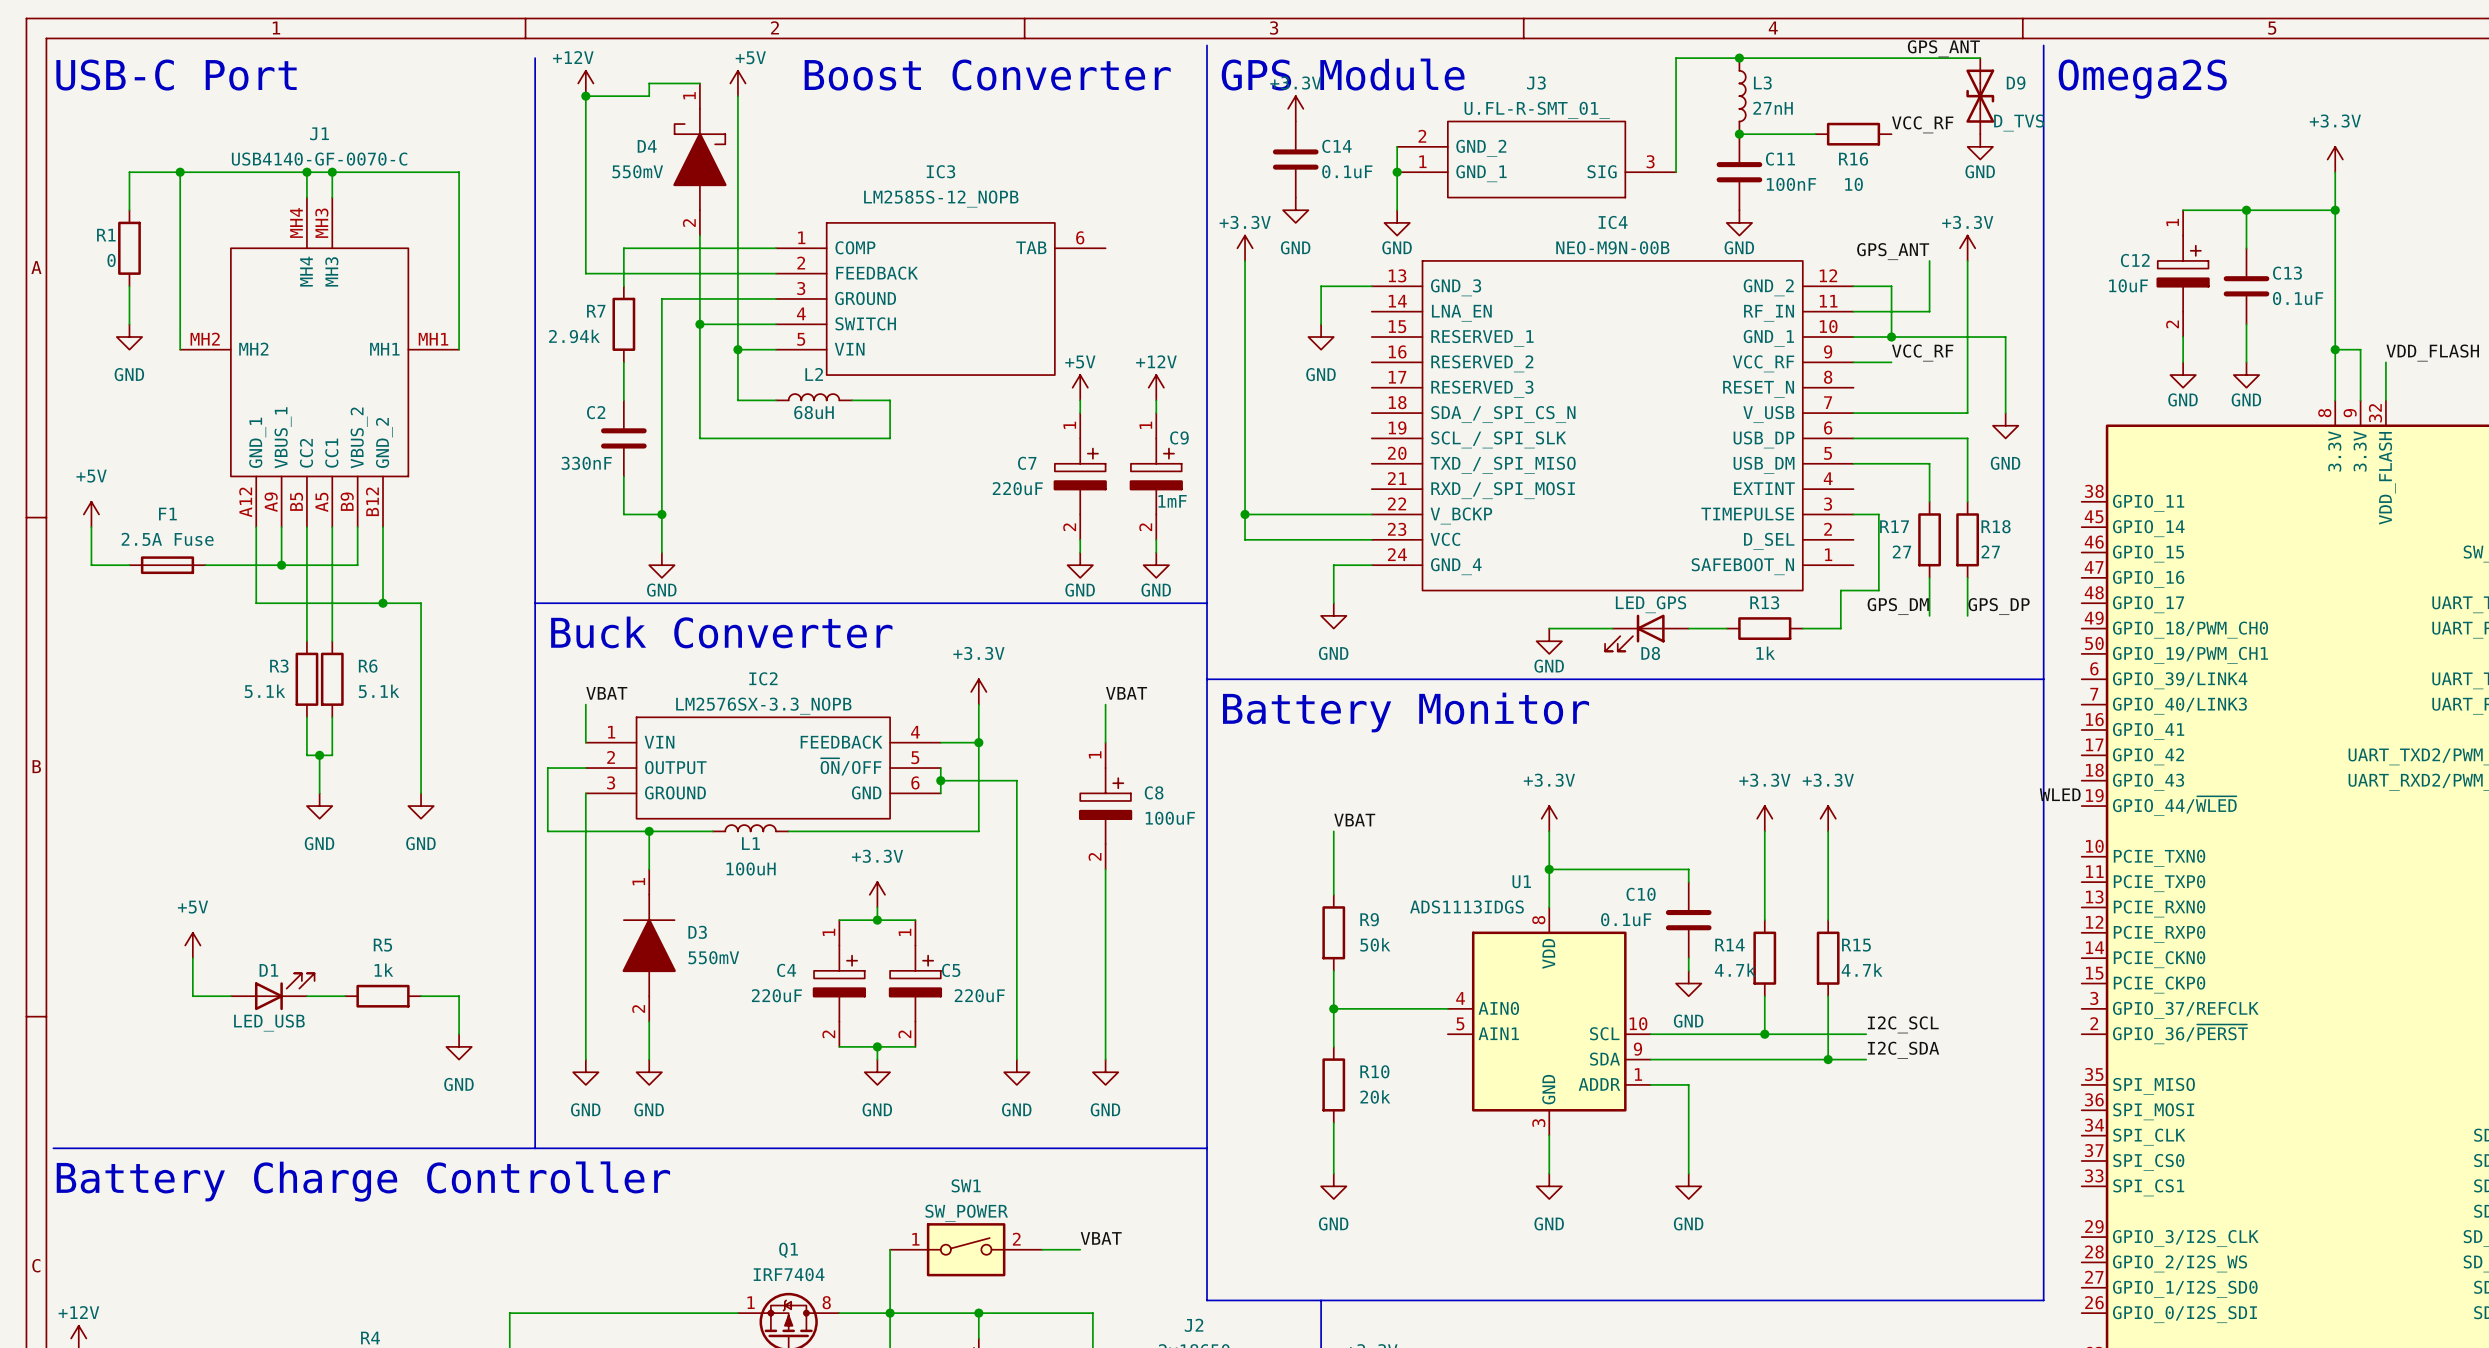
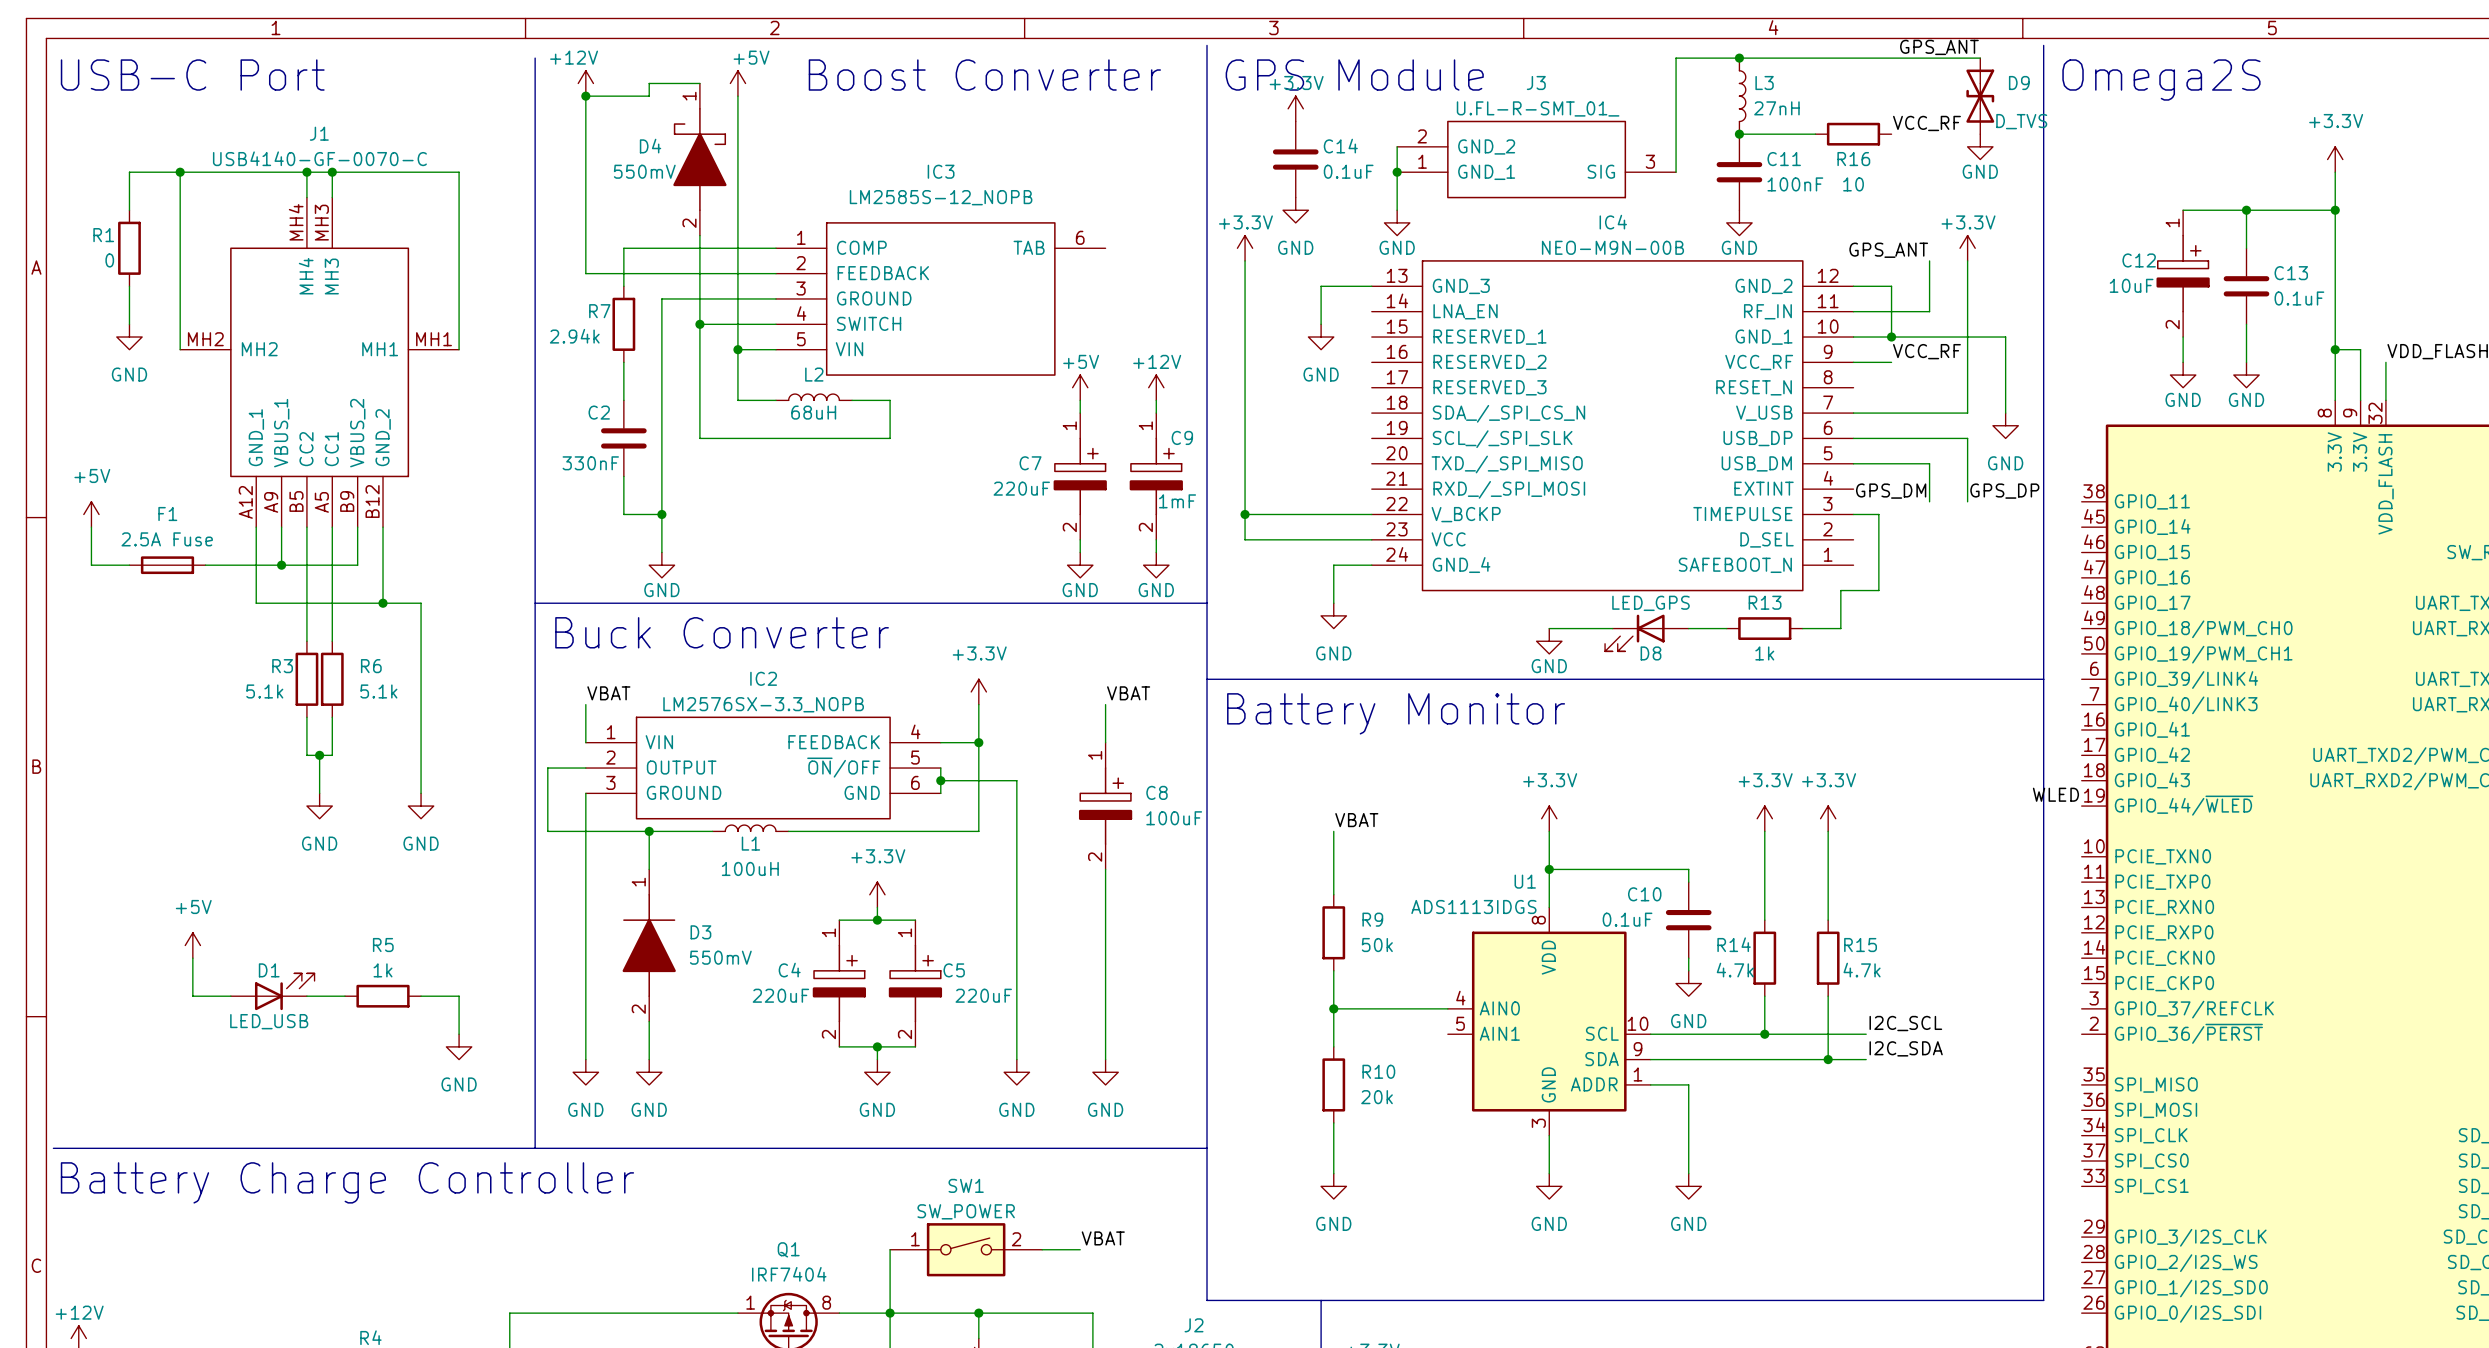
R17: 27 (1929, 539) -> none
R18: 27 (1967, 539) -> none
wire: (1929, 577) (1929, 615) -> none
wire: (1967, 577) (1967, 615) -> none
label position: GPS_DM (1898, 606) -> GPS_DM (1891, 491)
label position: GPS_DP (1999, 606) -> GPS_DP (2004, 491)

